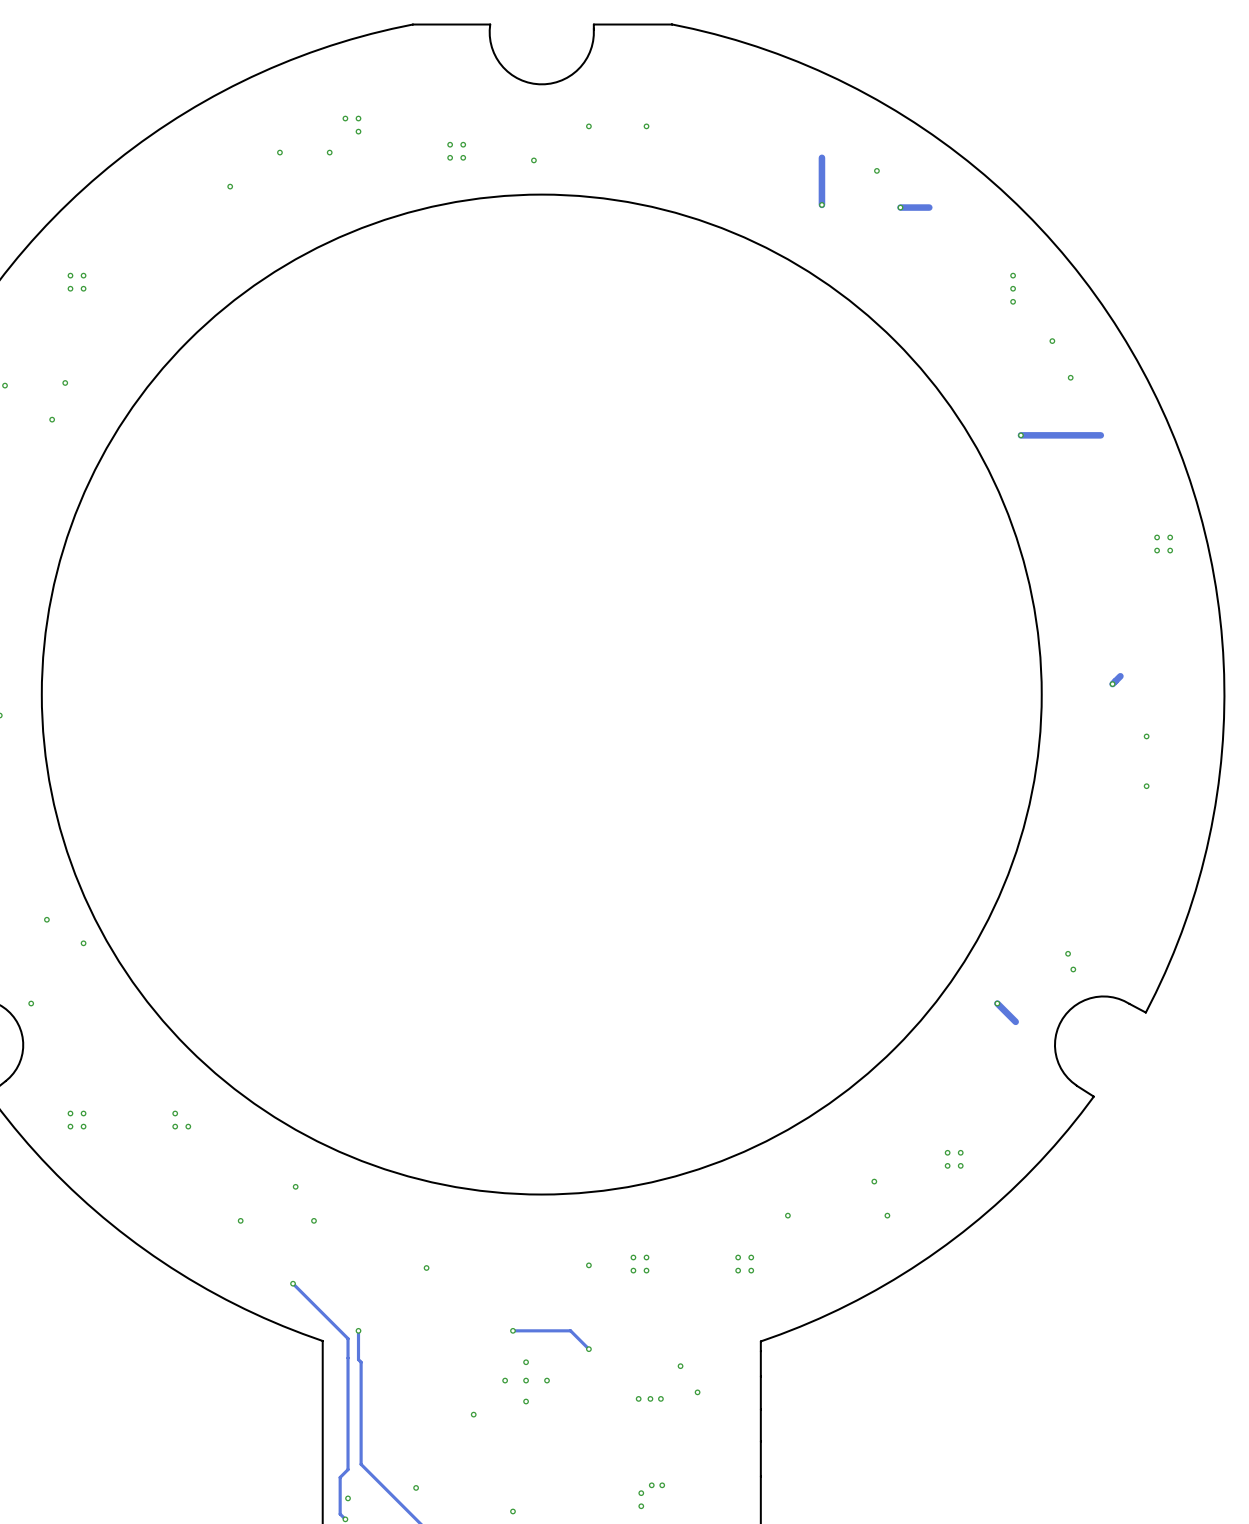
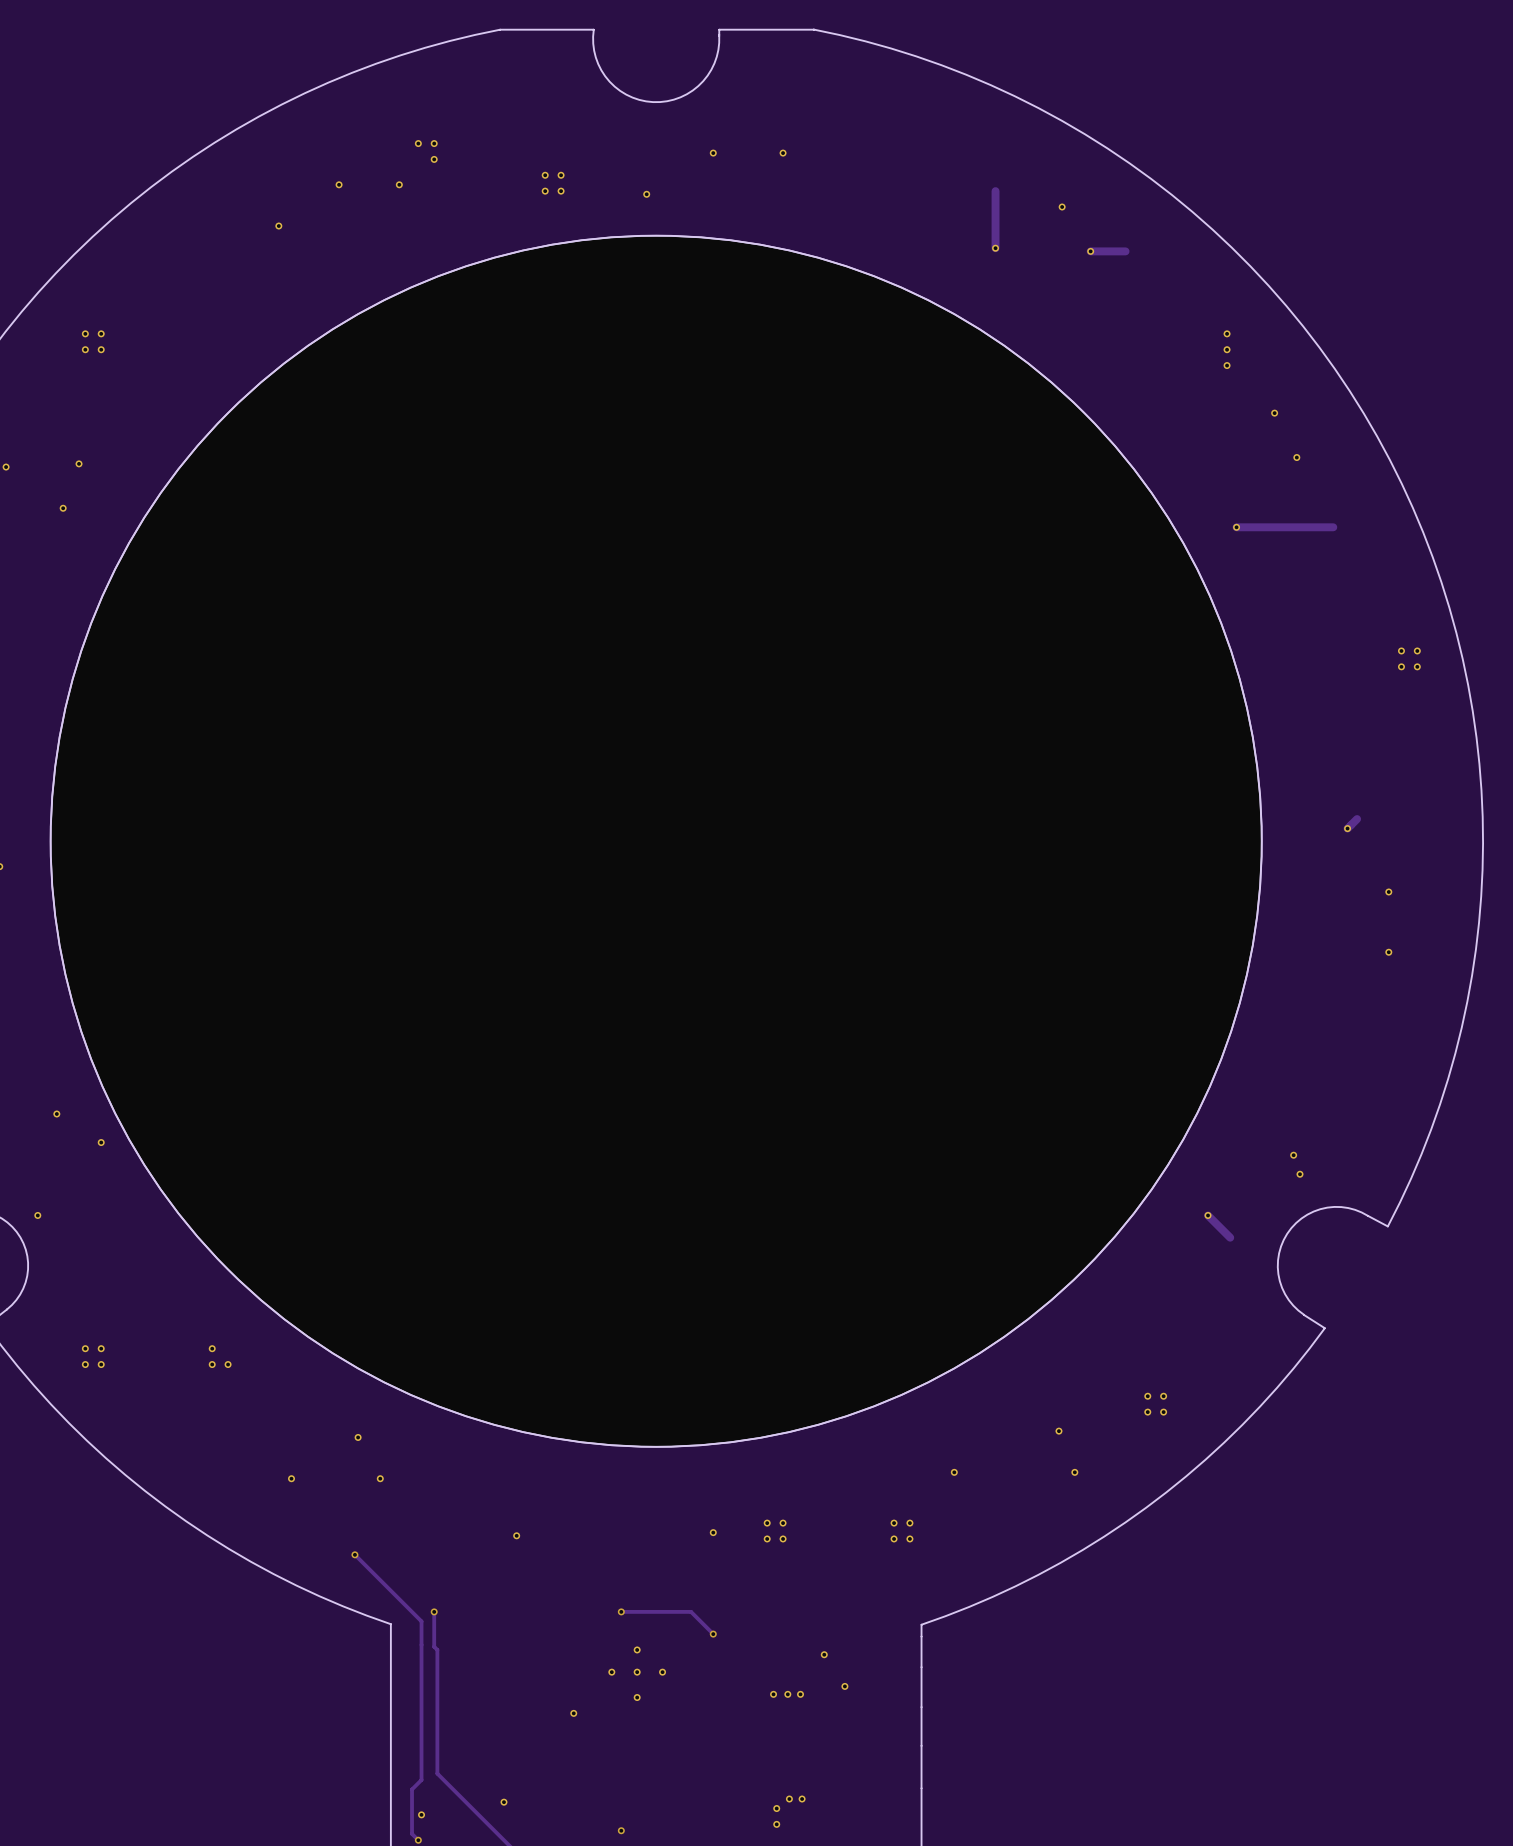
part: none -> (656, 841)

